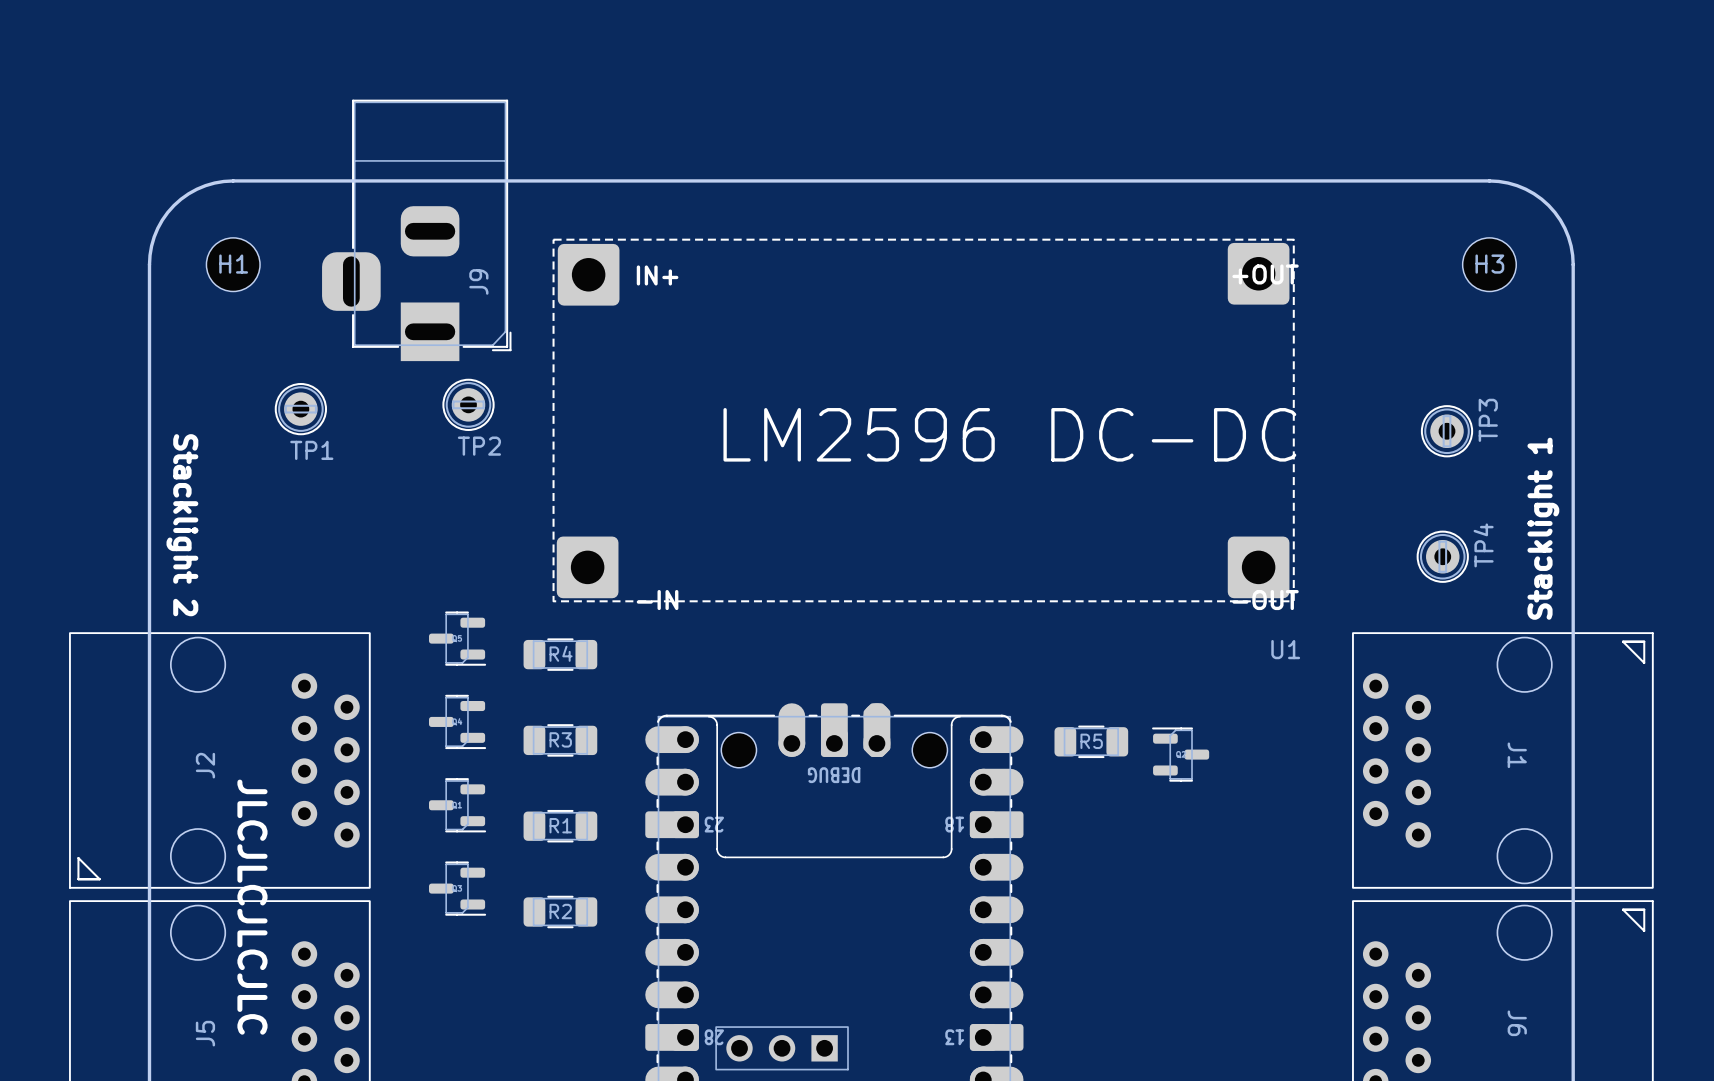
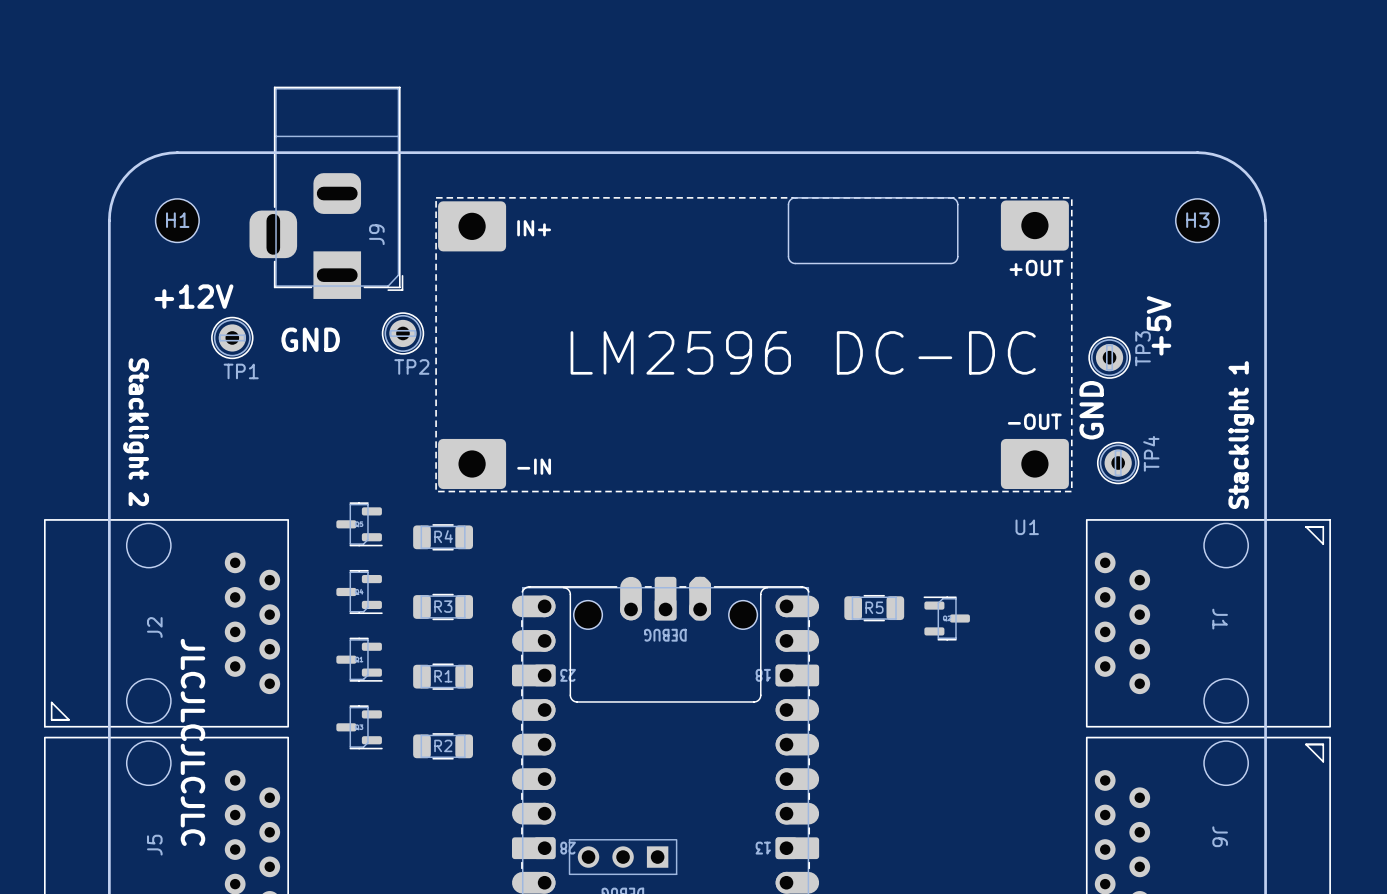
U1 footprint: [552, 238, 1295, 603] -> [435, 197, 1073, 493]
text: none -> +12V (193, 296)
text: none -> +5V (1159, 325)
TP2 position: (468, 404) -> (402, 333)
text: none -> GND (310, 339)
TP3 position: (1447, 431) -> (1109, 357)
text: none -> GND (1091, 410)
TP4 position: (1442, 556) -> (1118, 463)

